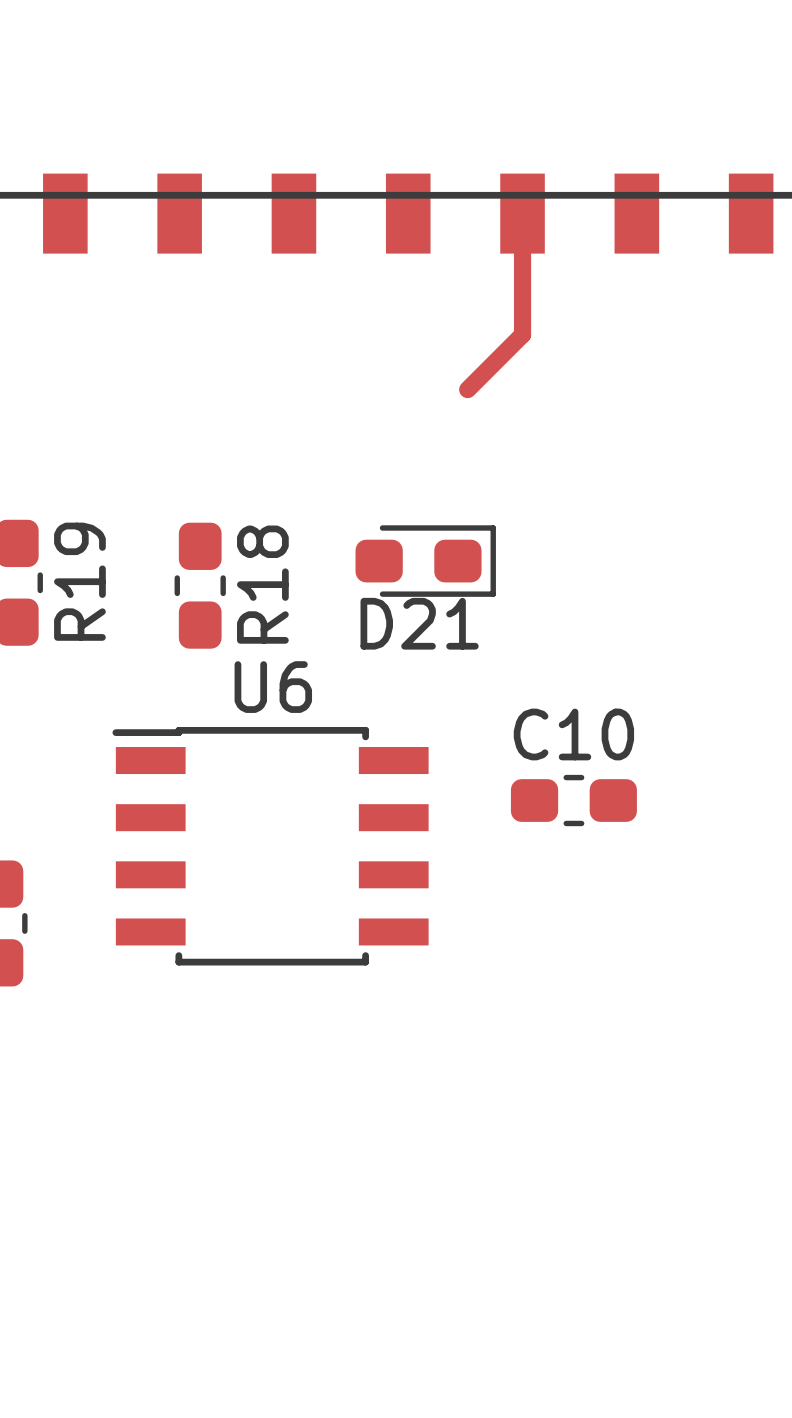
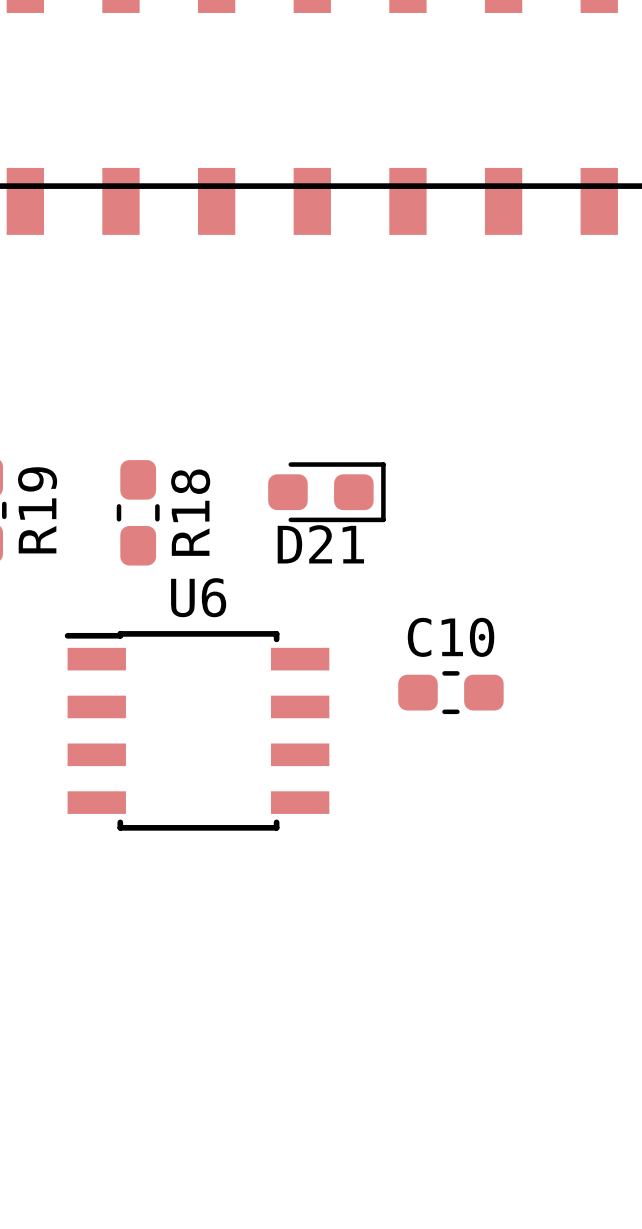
top track: (522, 213) (522, 334) (467, 389) -> none

